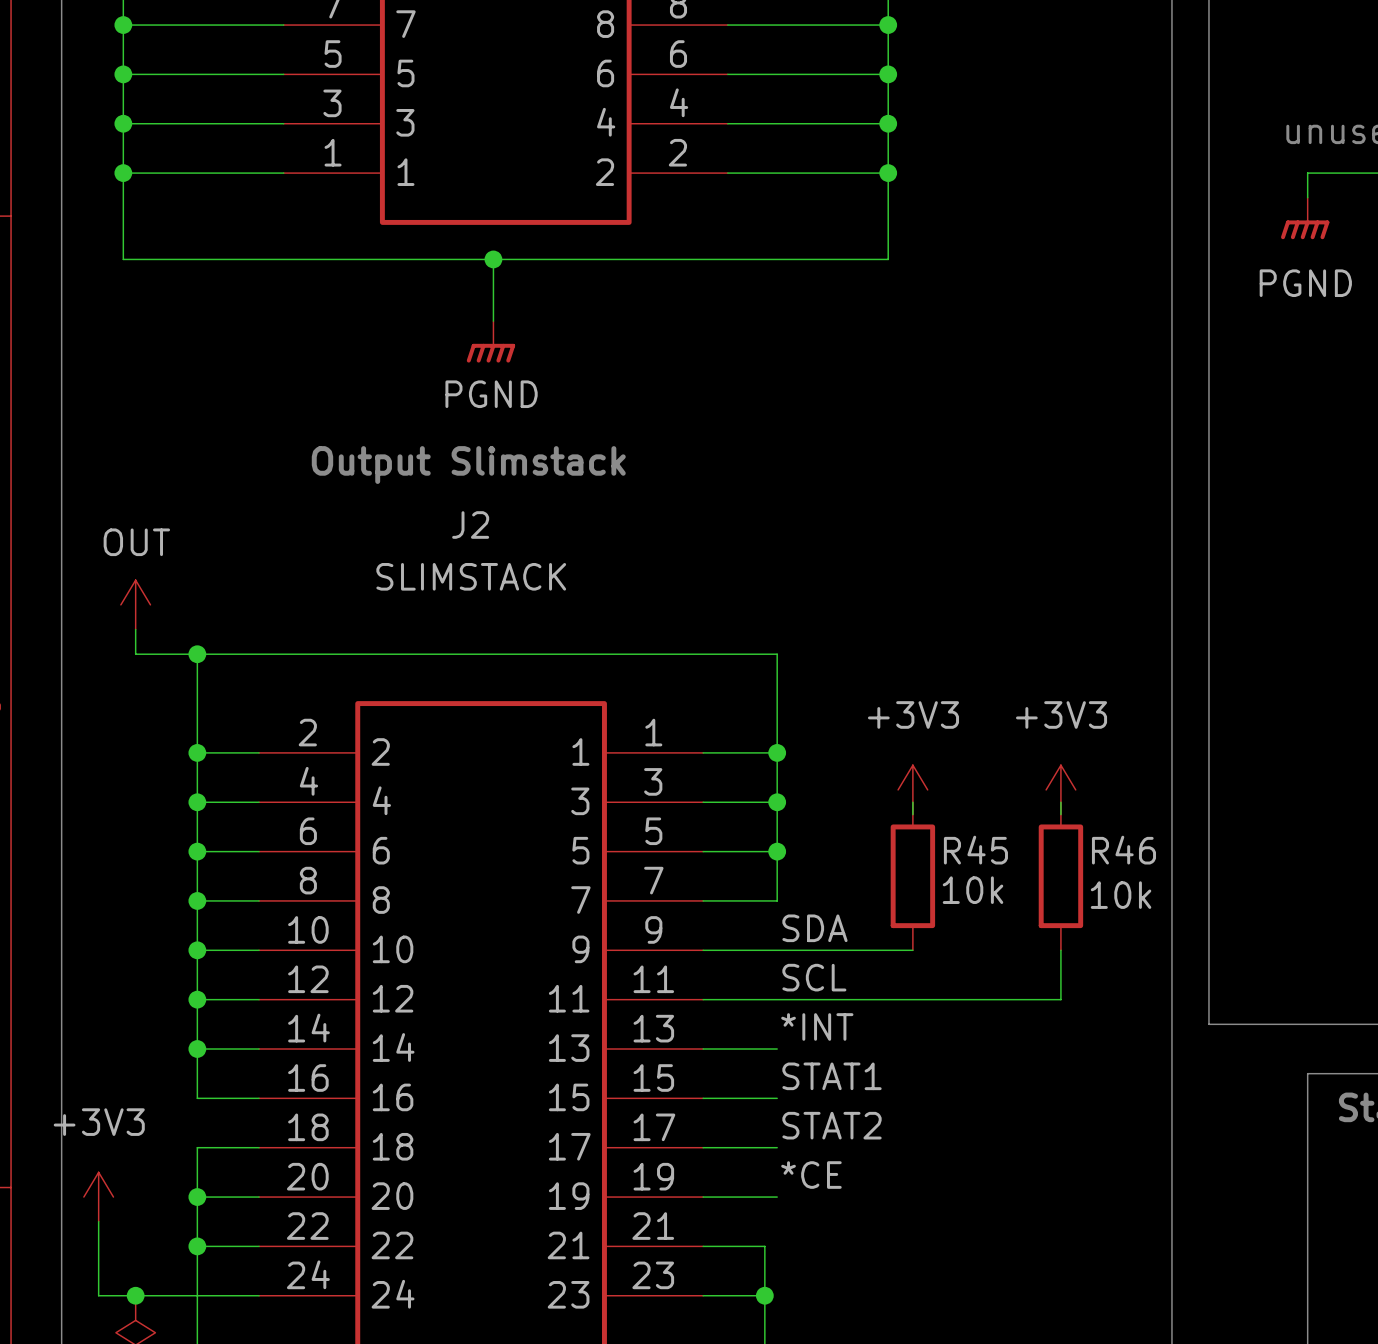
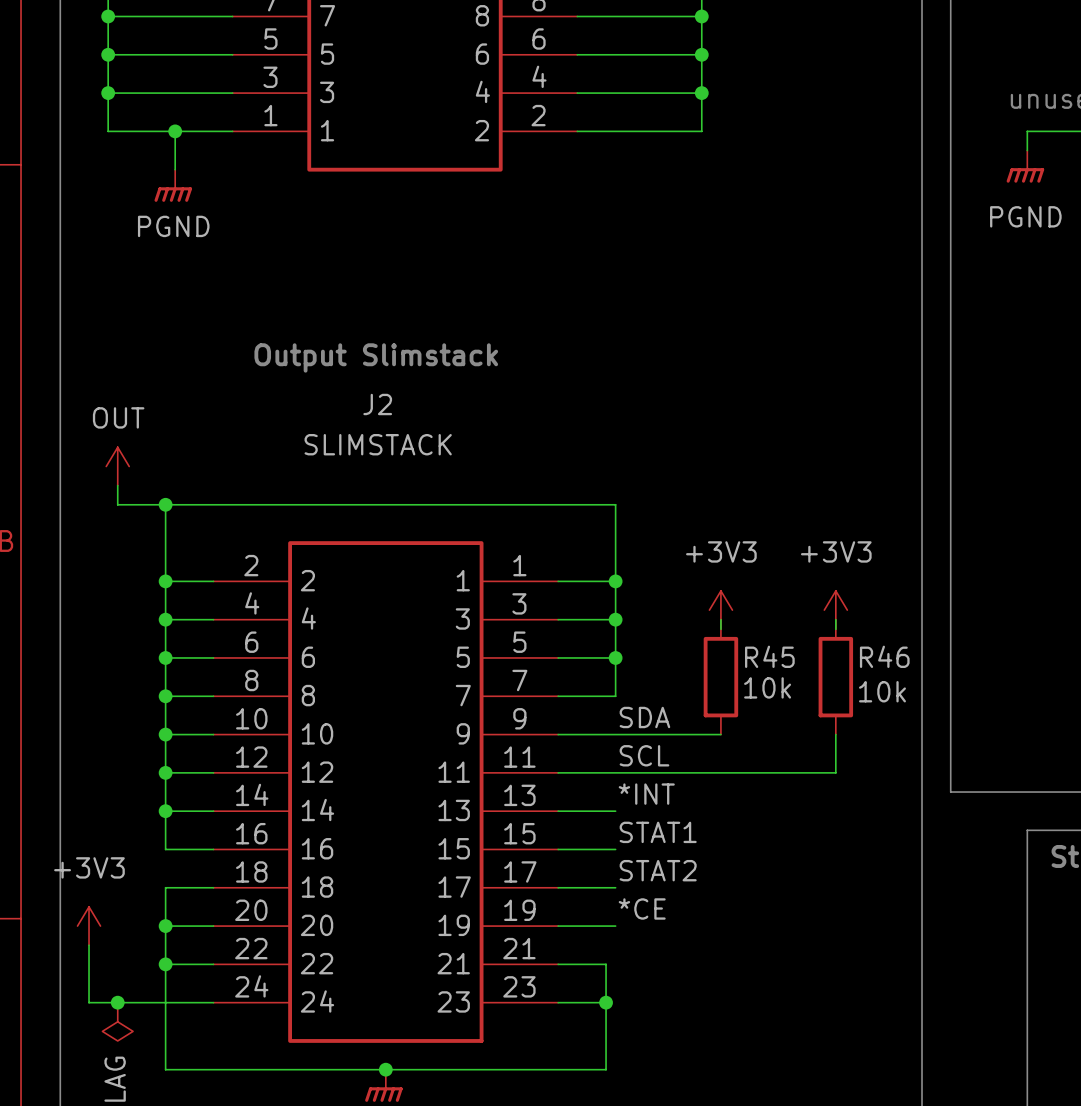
wire: (123, 173) (123, 259) (888, 259) (888, 173) -> none
junction position: (123, 173) -> (175, 131)
wire: none -> (175, 131) (175, 169)
junction: (888, 173) -> none
wire: (493, 259) (493, 321) -> none
junction: (493, 259) -> none
power symbol position: PGND (490, 341) -> PGND (173, 185)

